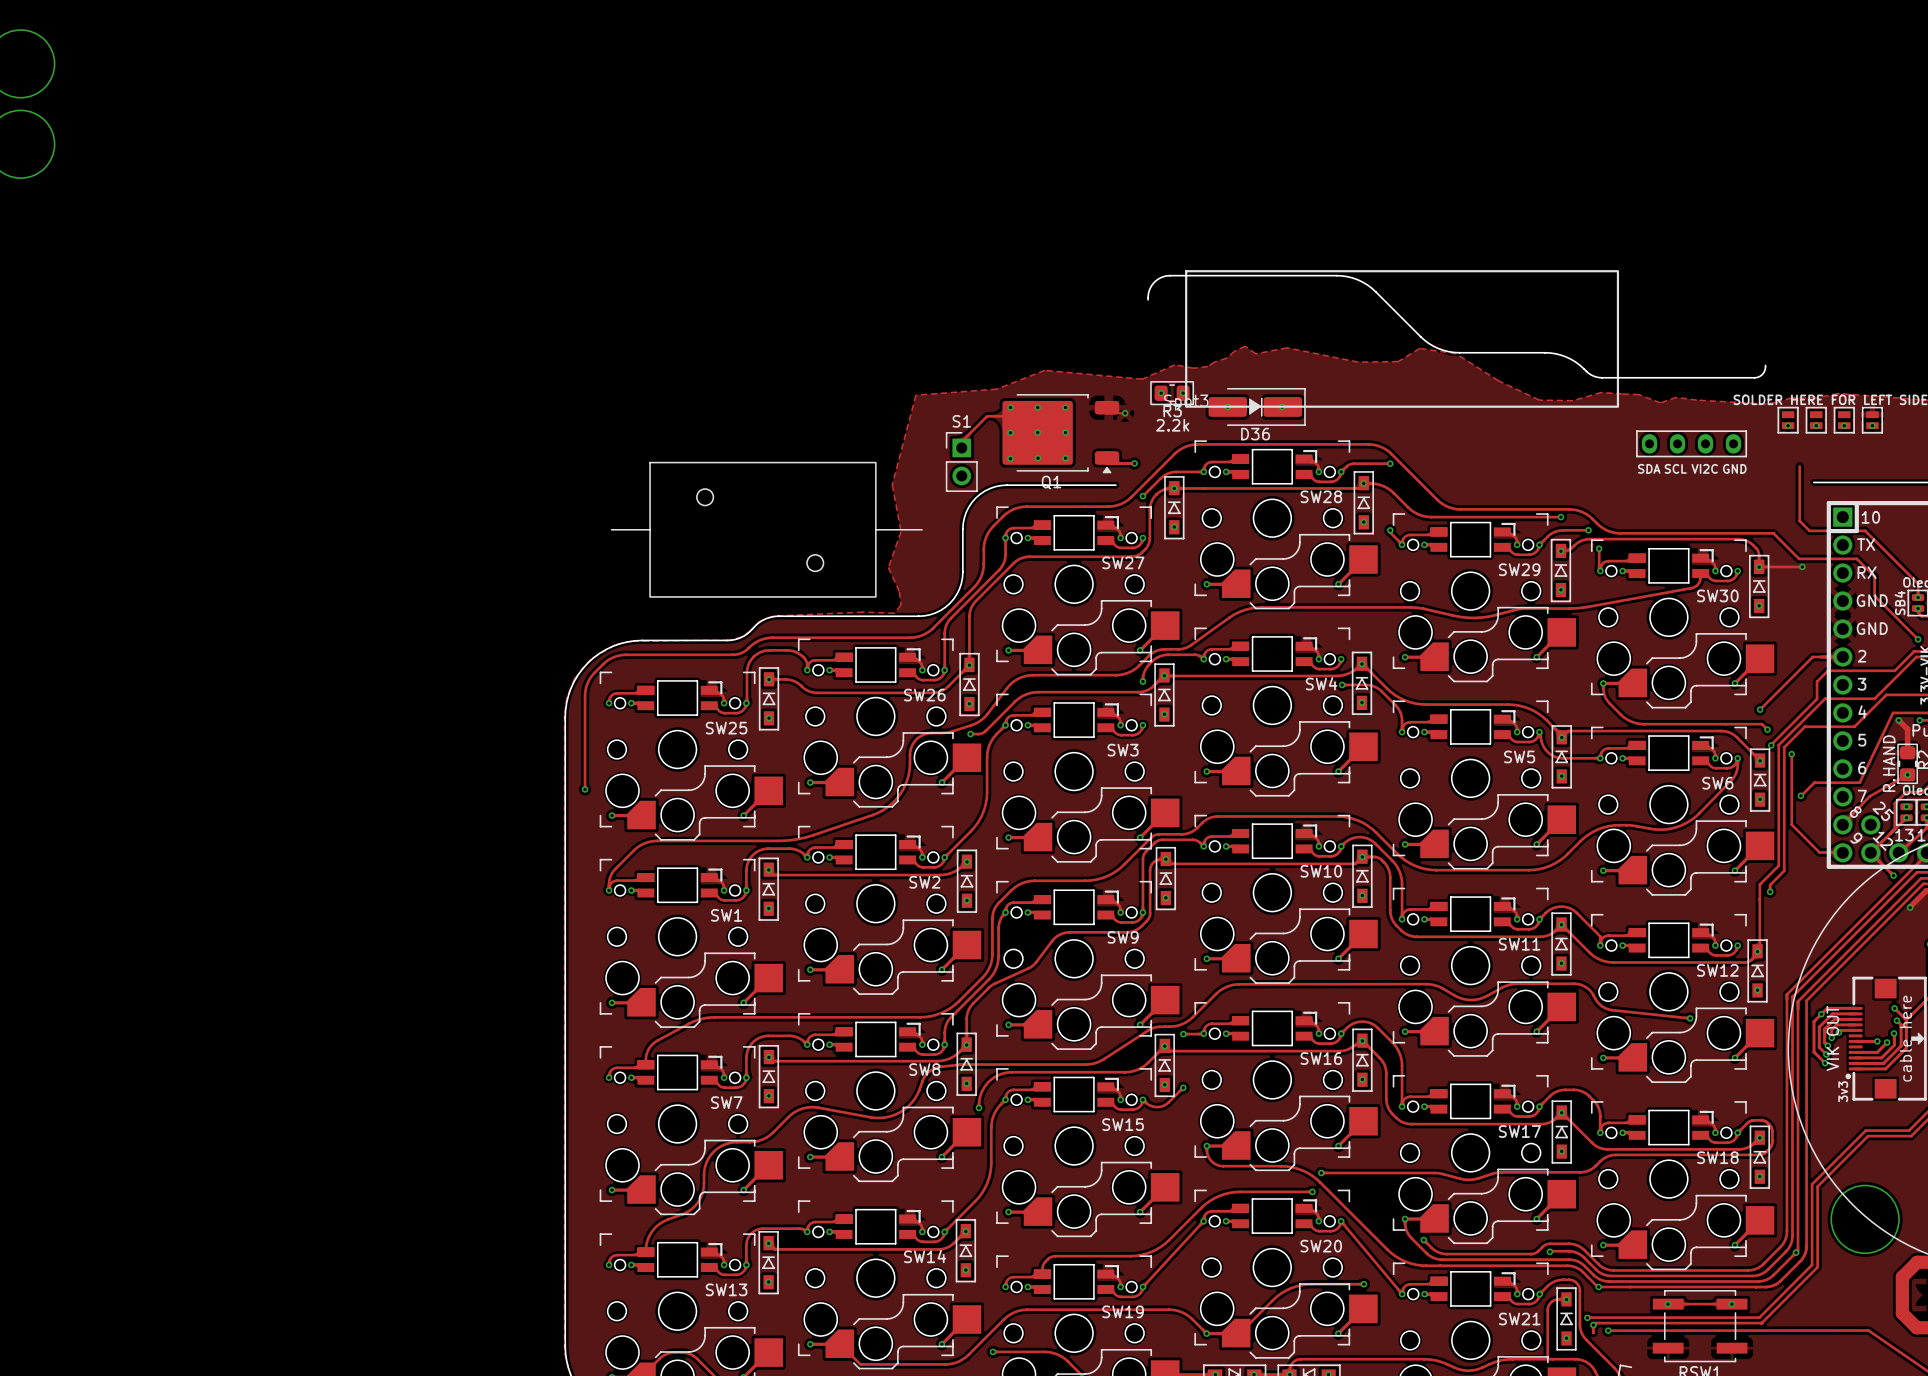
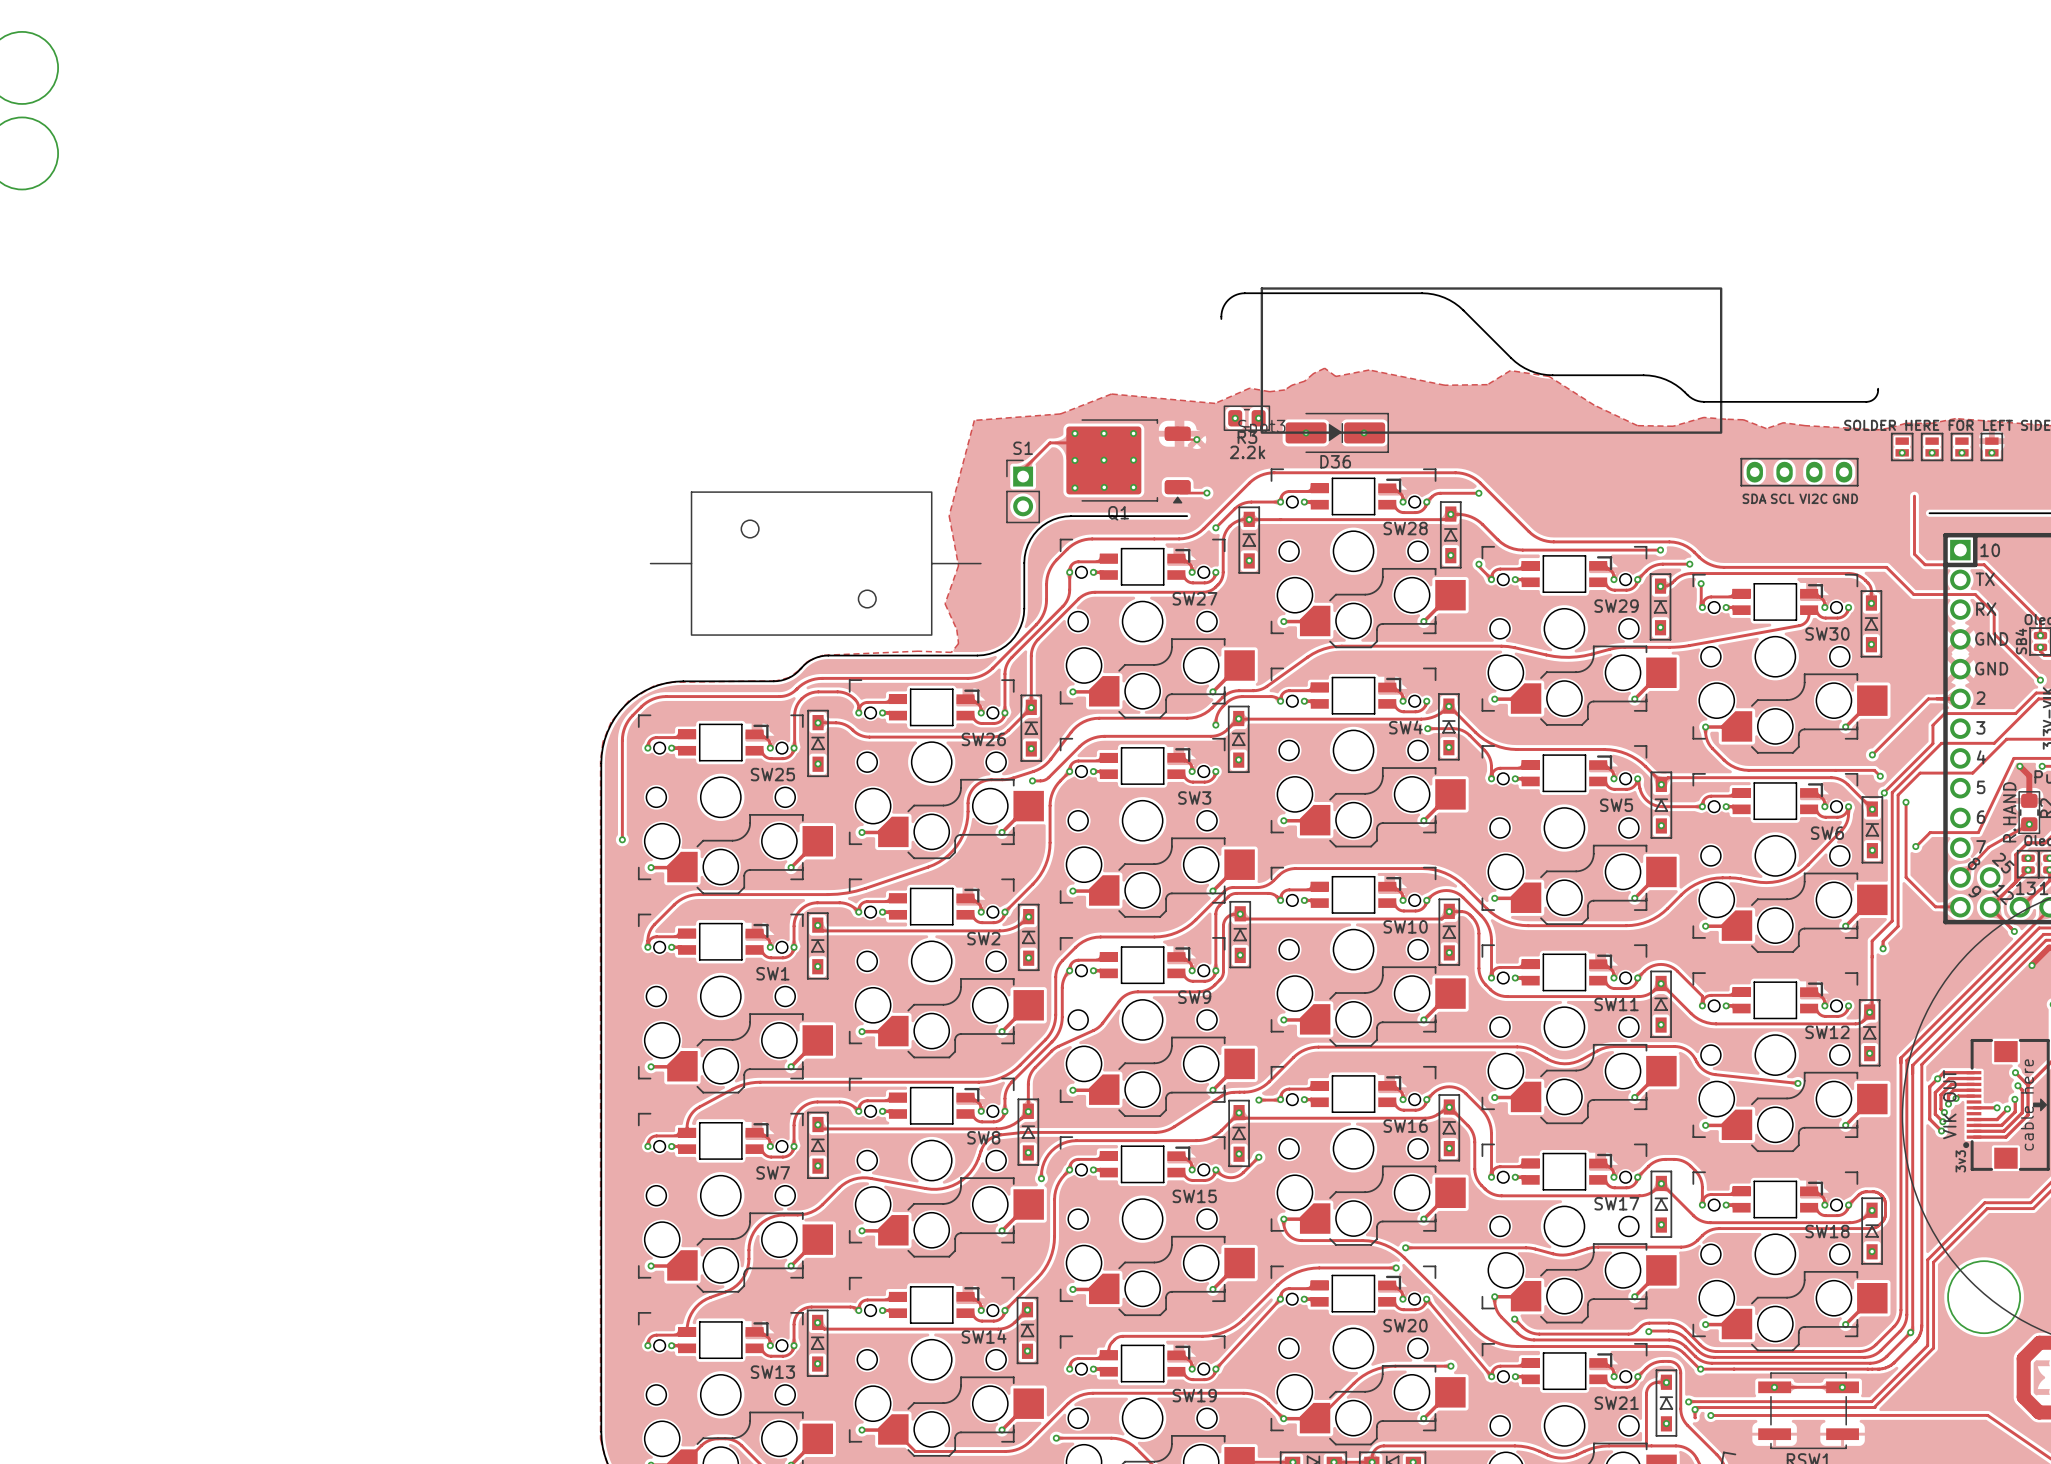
track: (1759, 566) (1802, 566) -> none
via: (1802, 566) -> none

